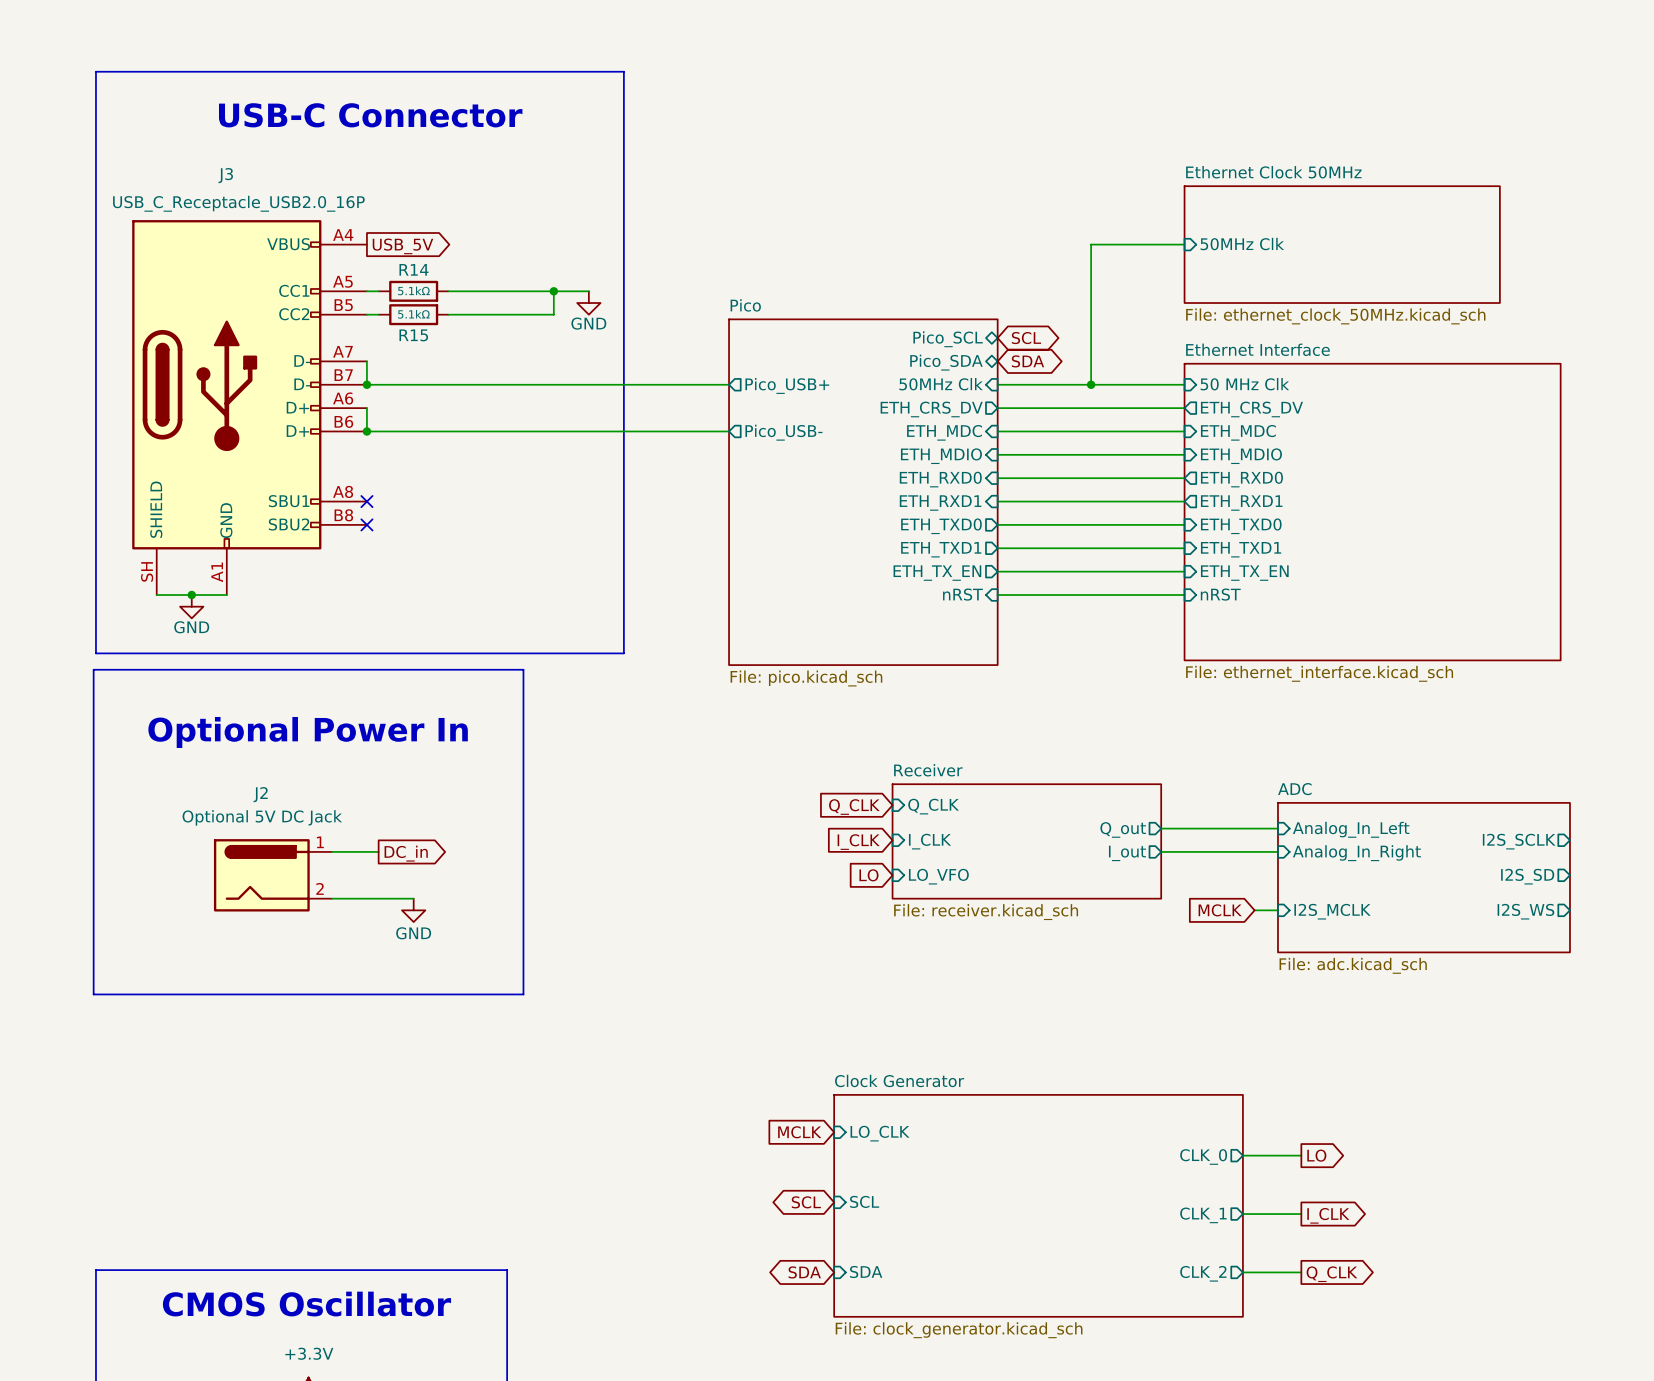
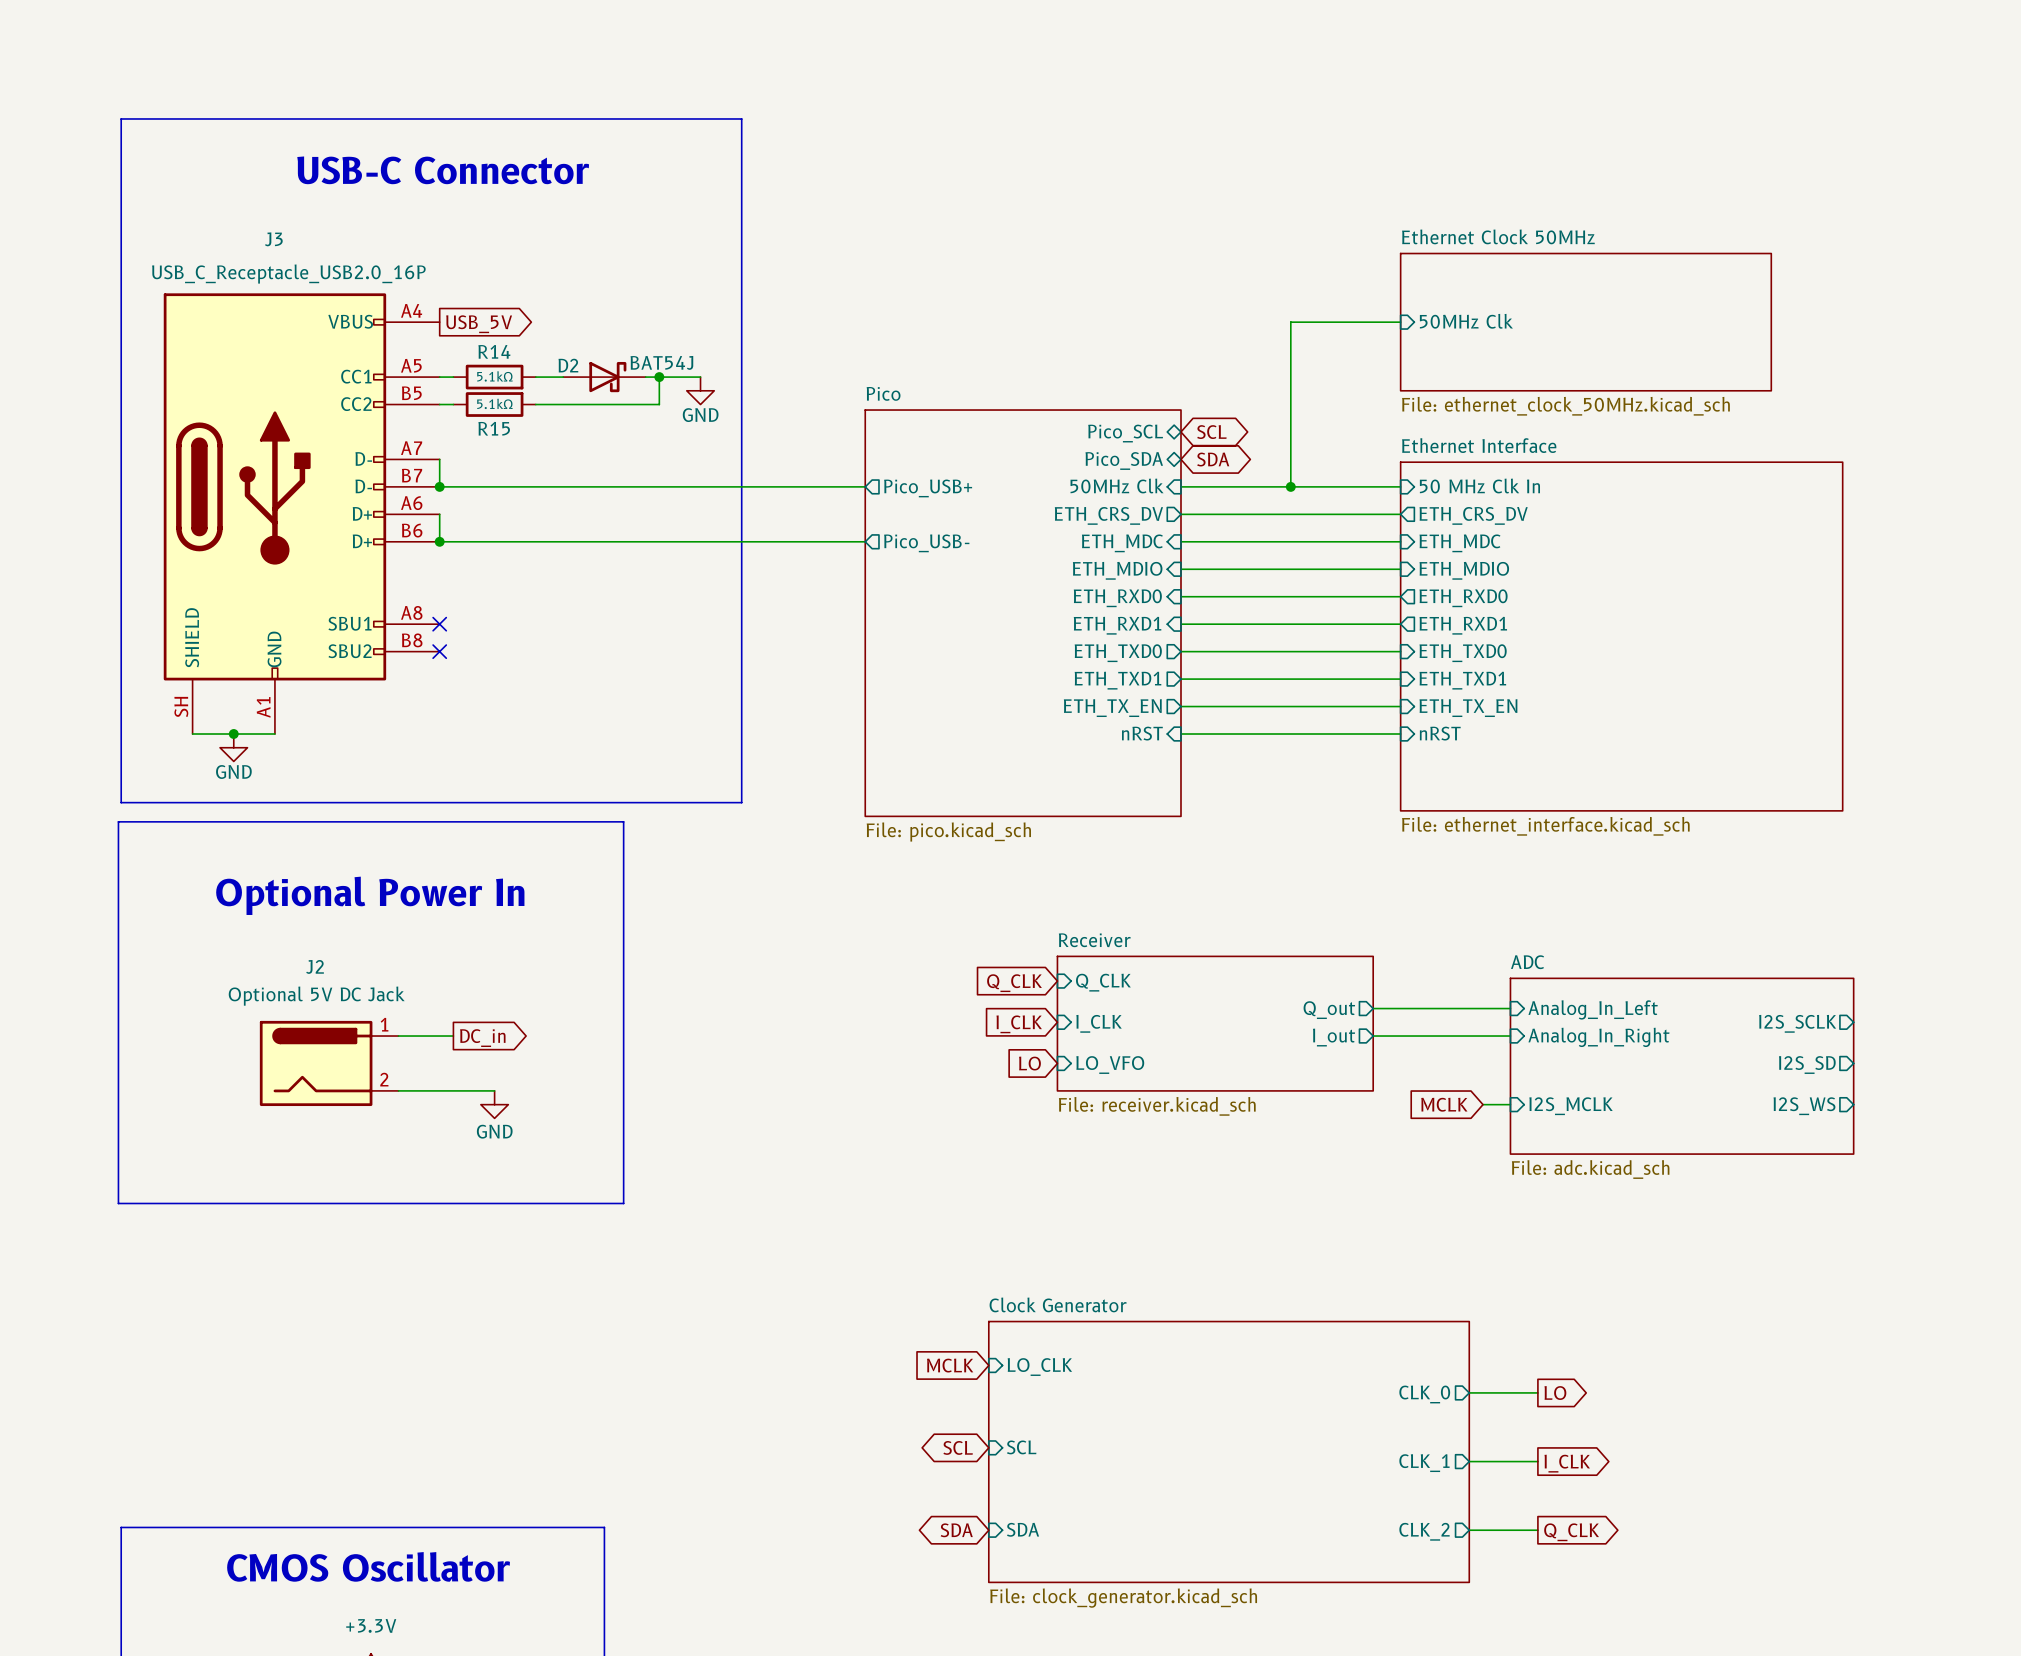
D2: none -> BAT54J (604, 377)
sheet pin: 50 MHz Clk (1244, 384) -> 50 MHz Clk In (1479, 486)

